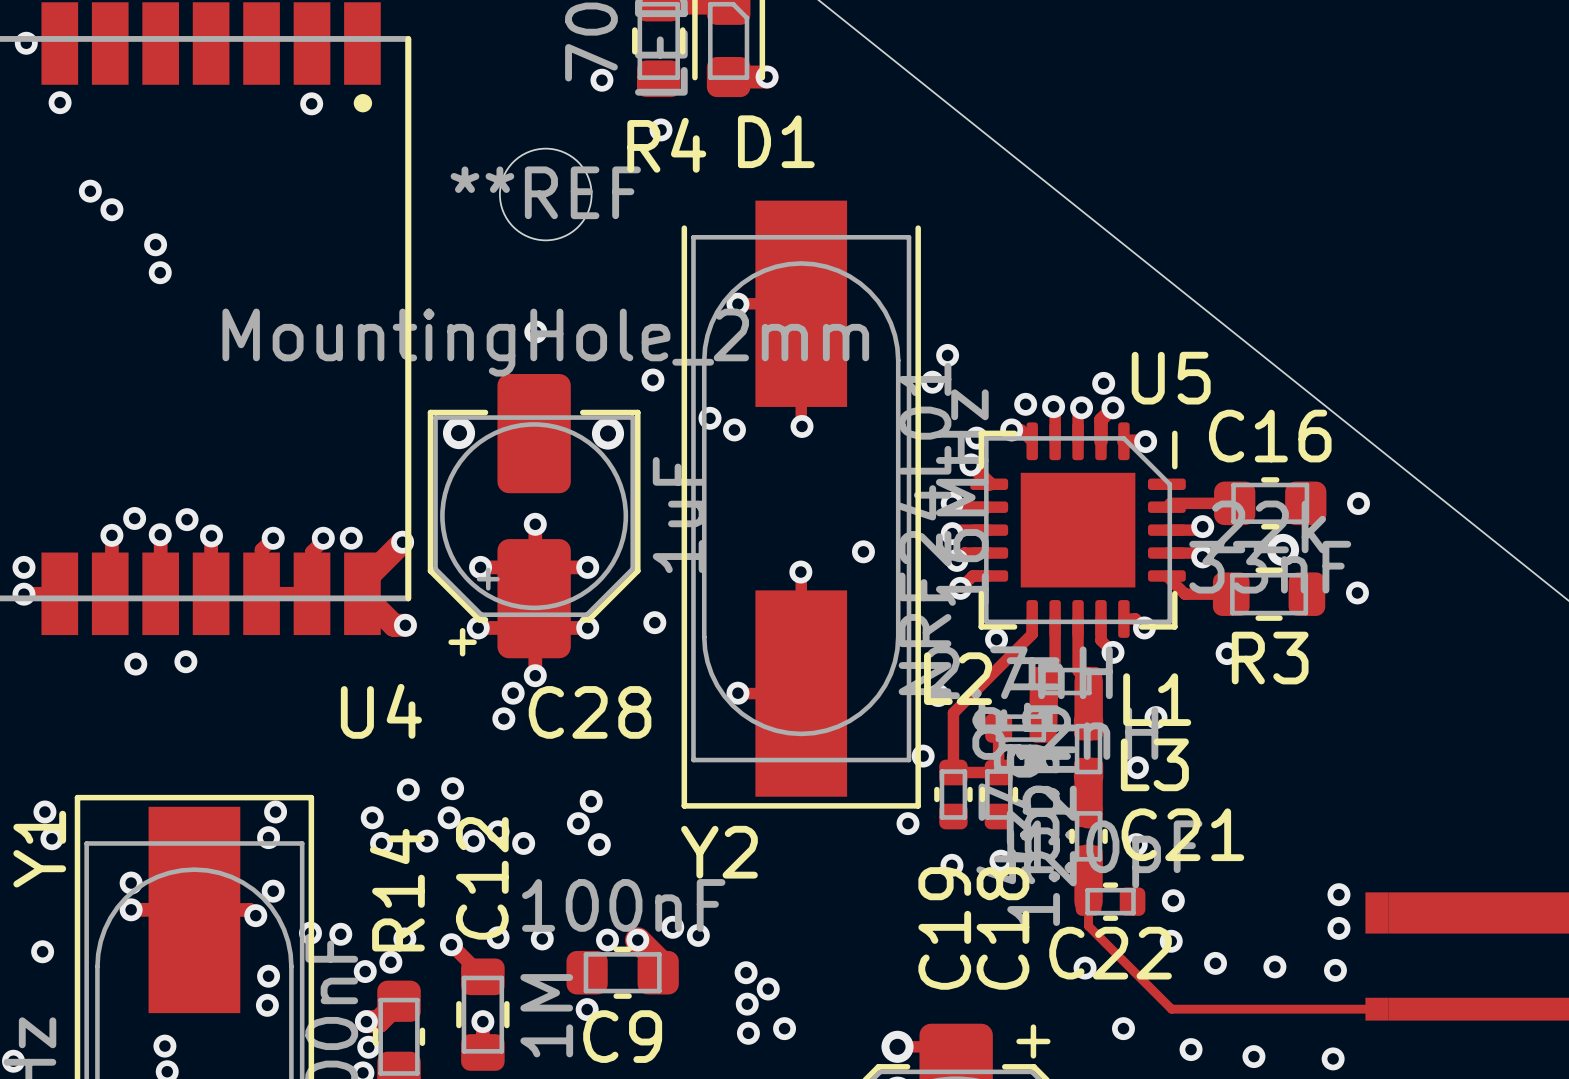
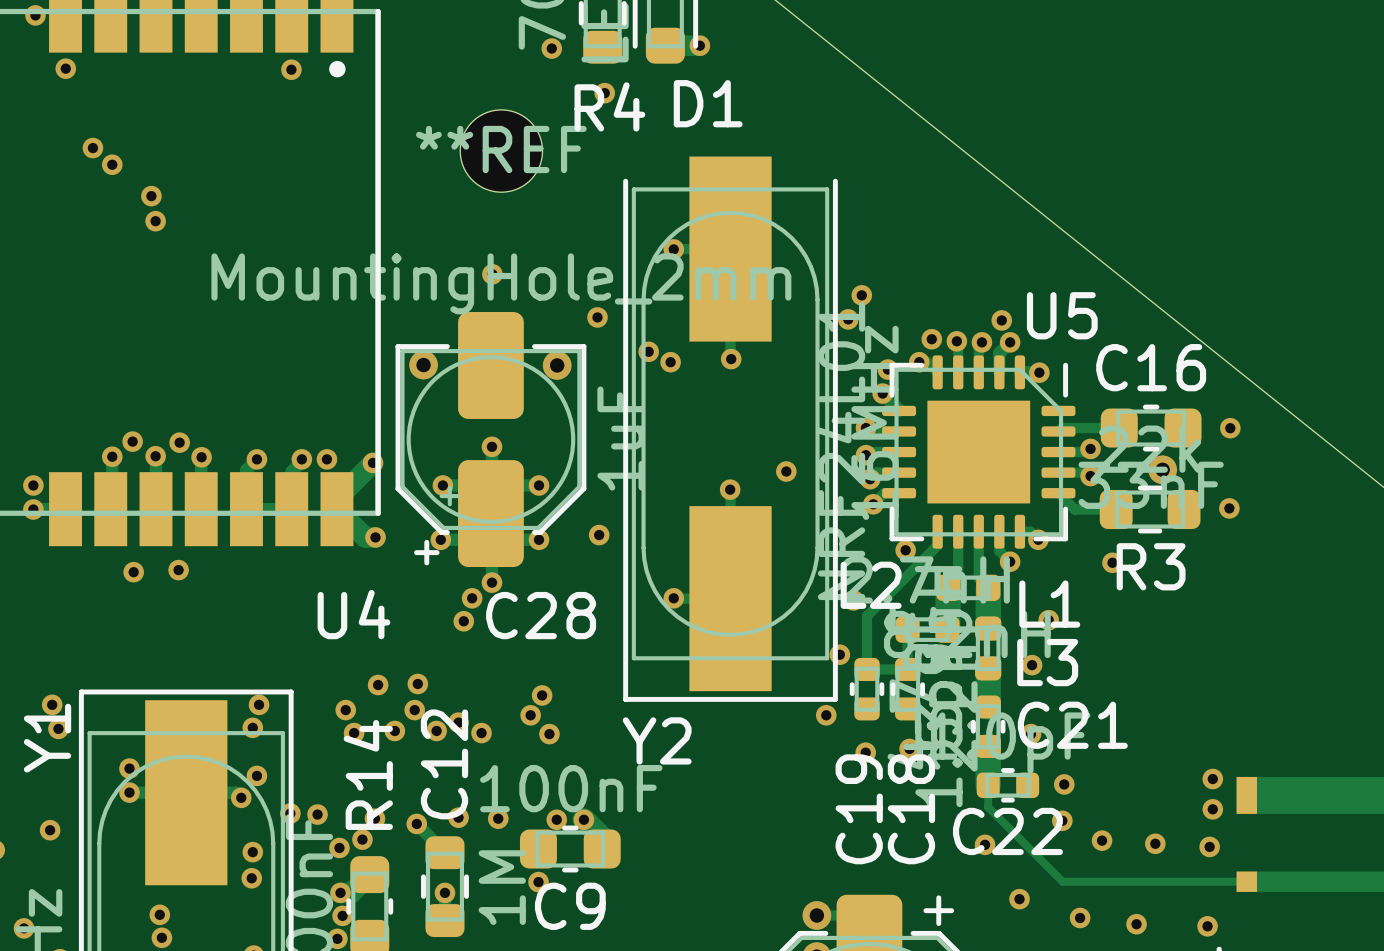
via: (672, 927) -> none
via: (698, 935) -> none
via: (746, 972) -> none
via: (768, 989) -> none
via: (747, 1004) -> none
via: (784, 1028) -> none
via: (748, 1033) -> none

